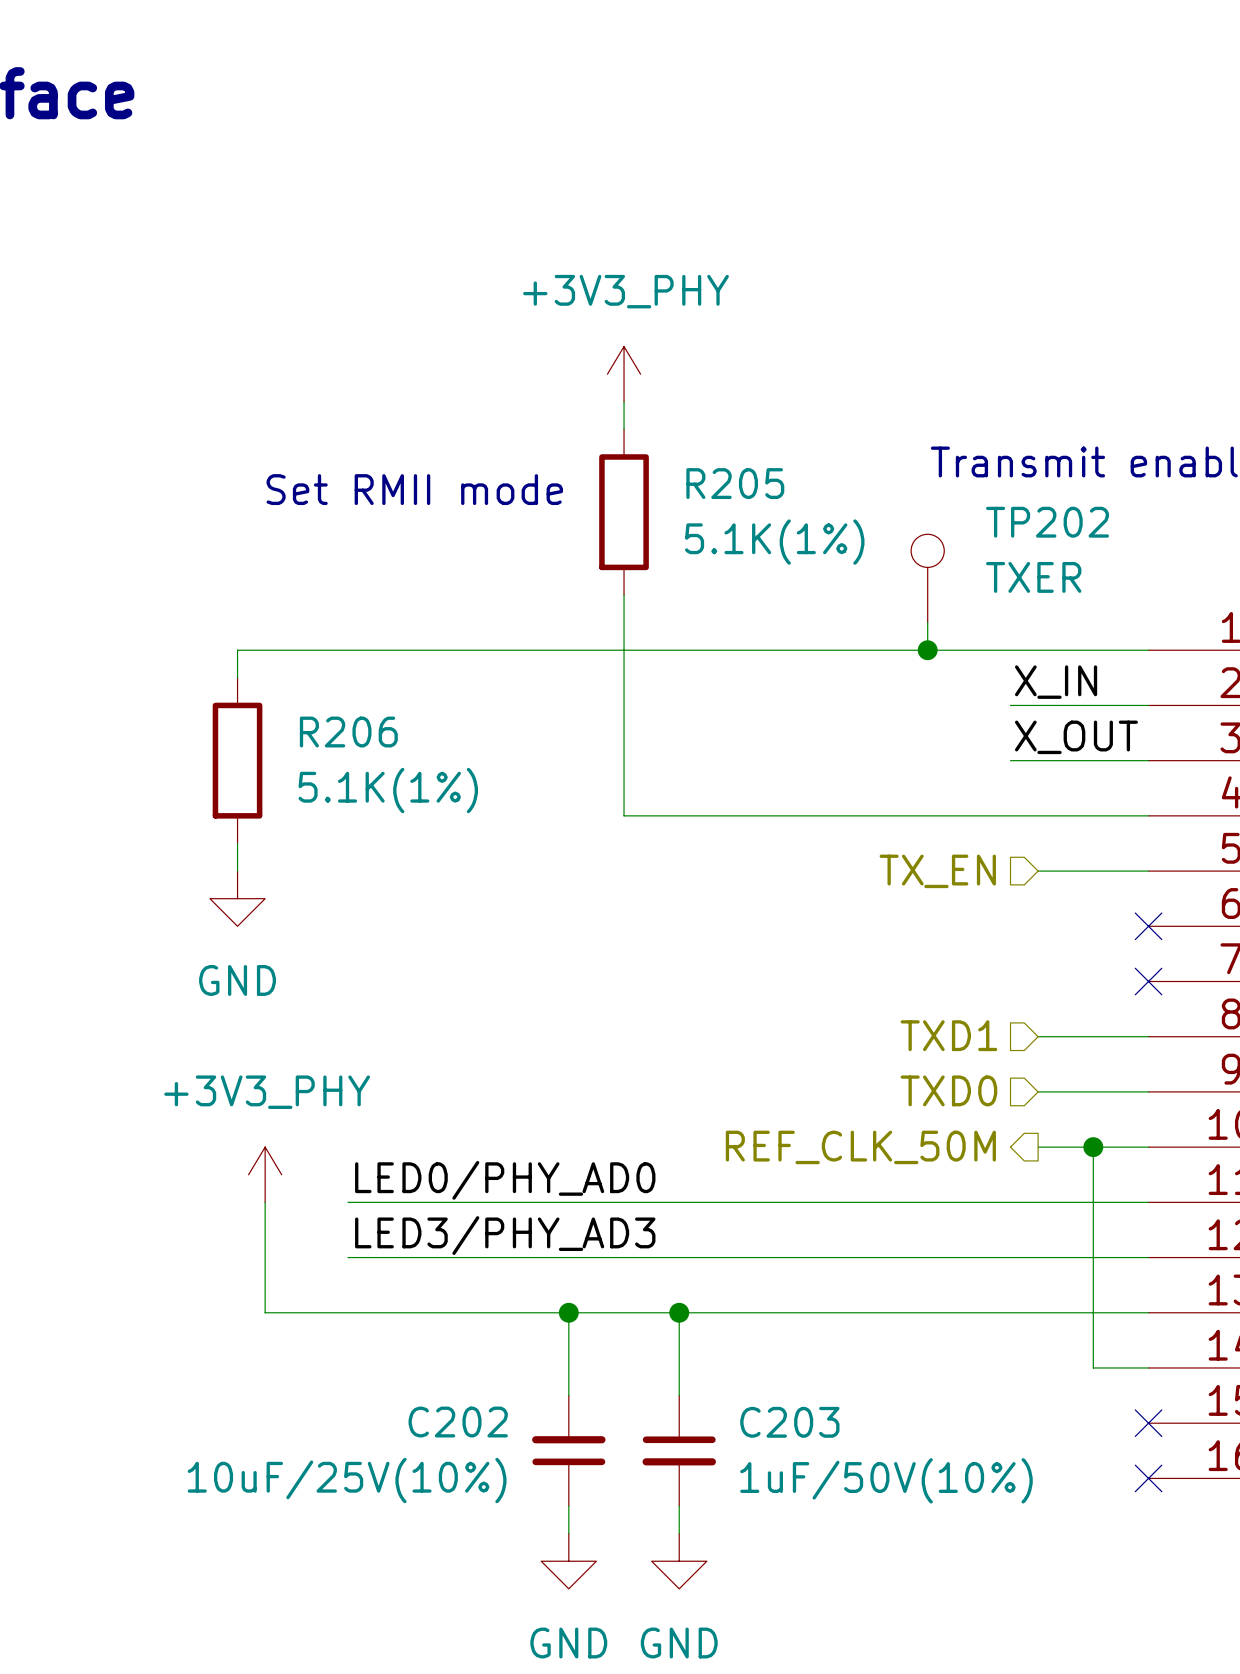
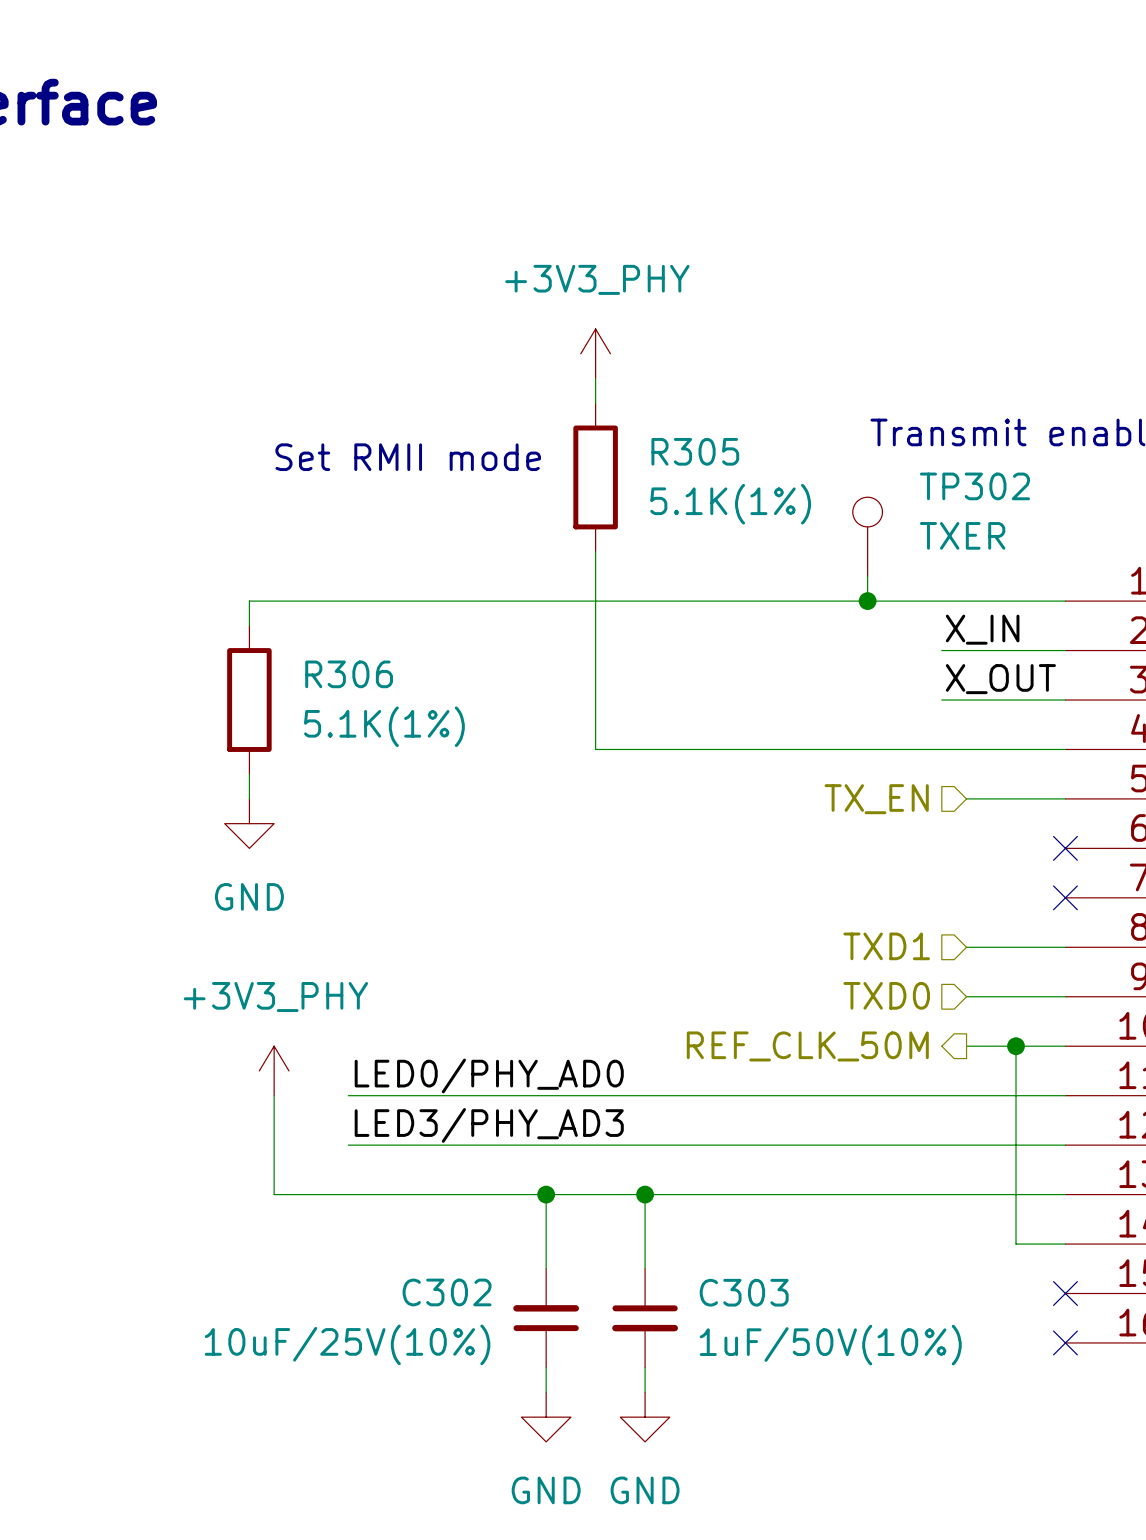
R205 name: R205 (735, 483) -> R305 (695, 451)
TP202 name: TP202 (1047, 522) -> TP302 (974, 486)
R206 name: R206 (348, 732) -> R306 (349, 674)
C202 name: C202 (458, 1422) -> C302 (447, 1292)
C203 name: C203 (789, 1422) -> C303 (744, 1292)

